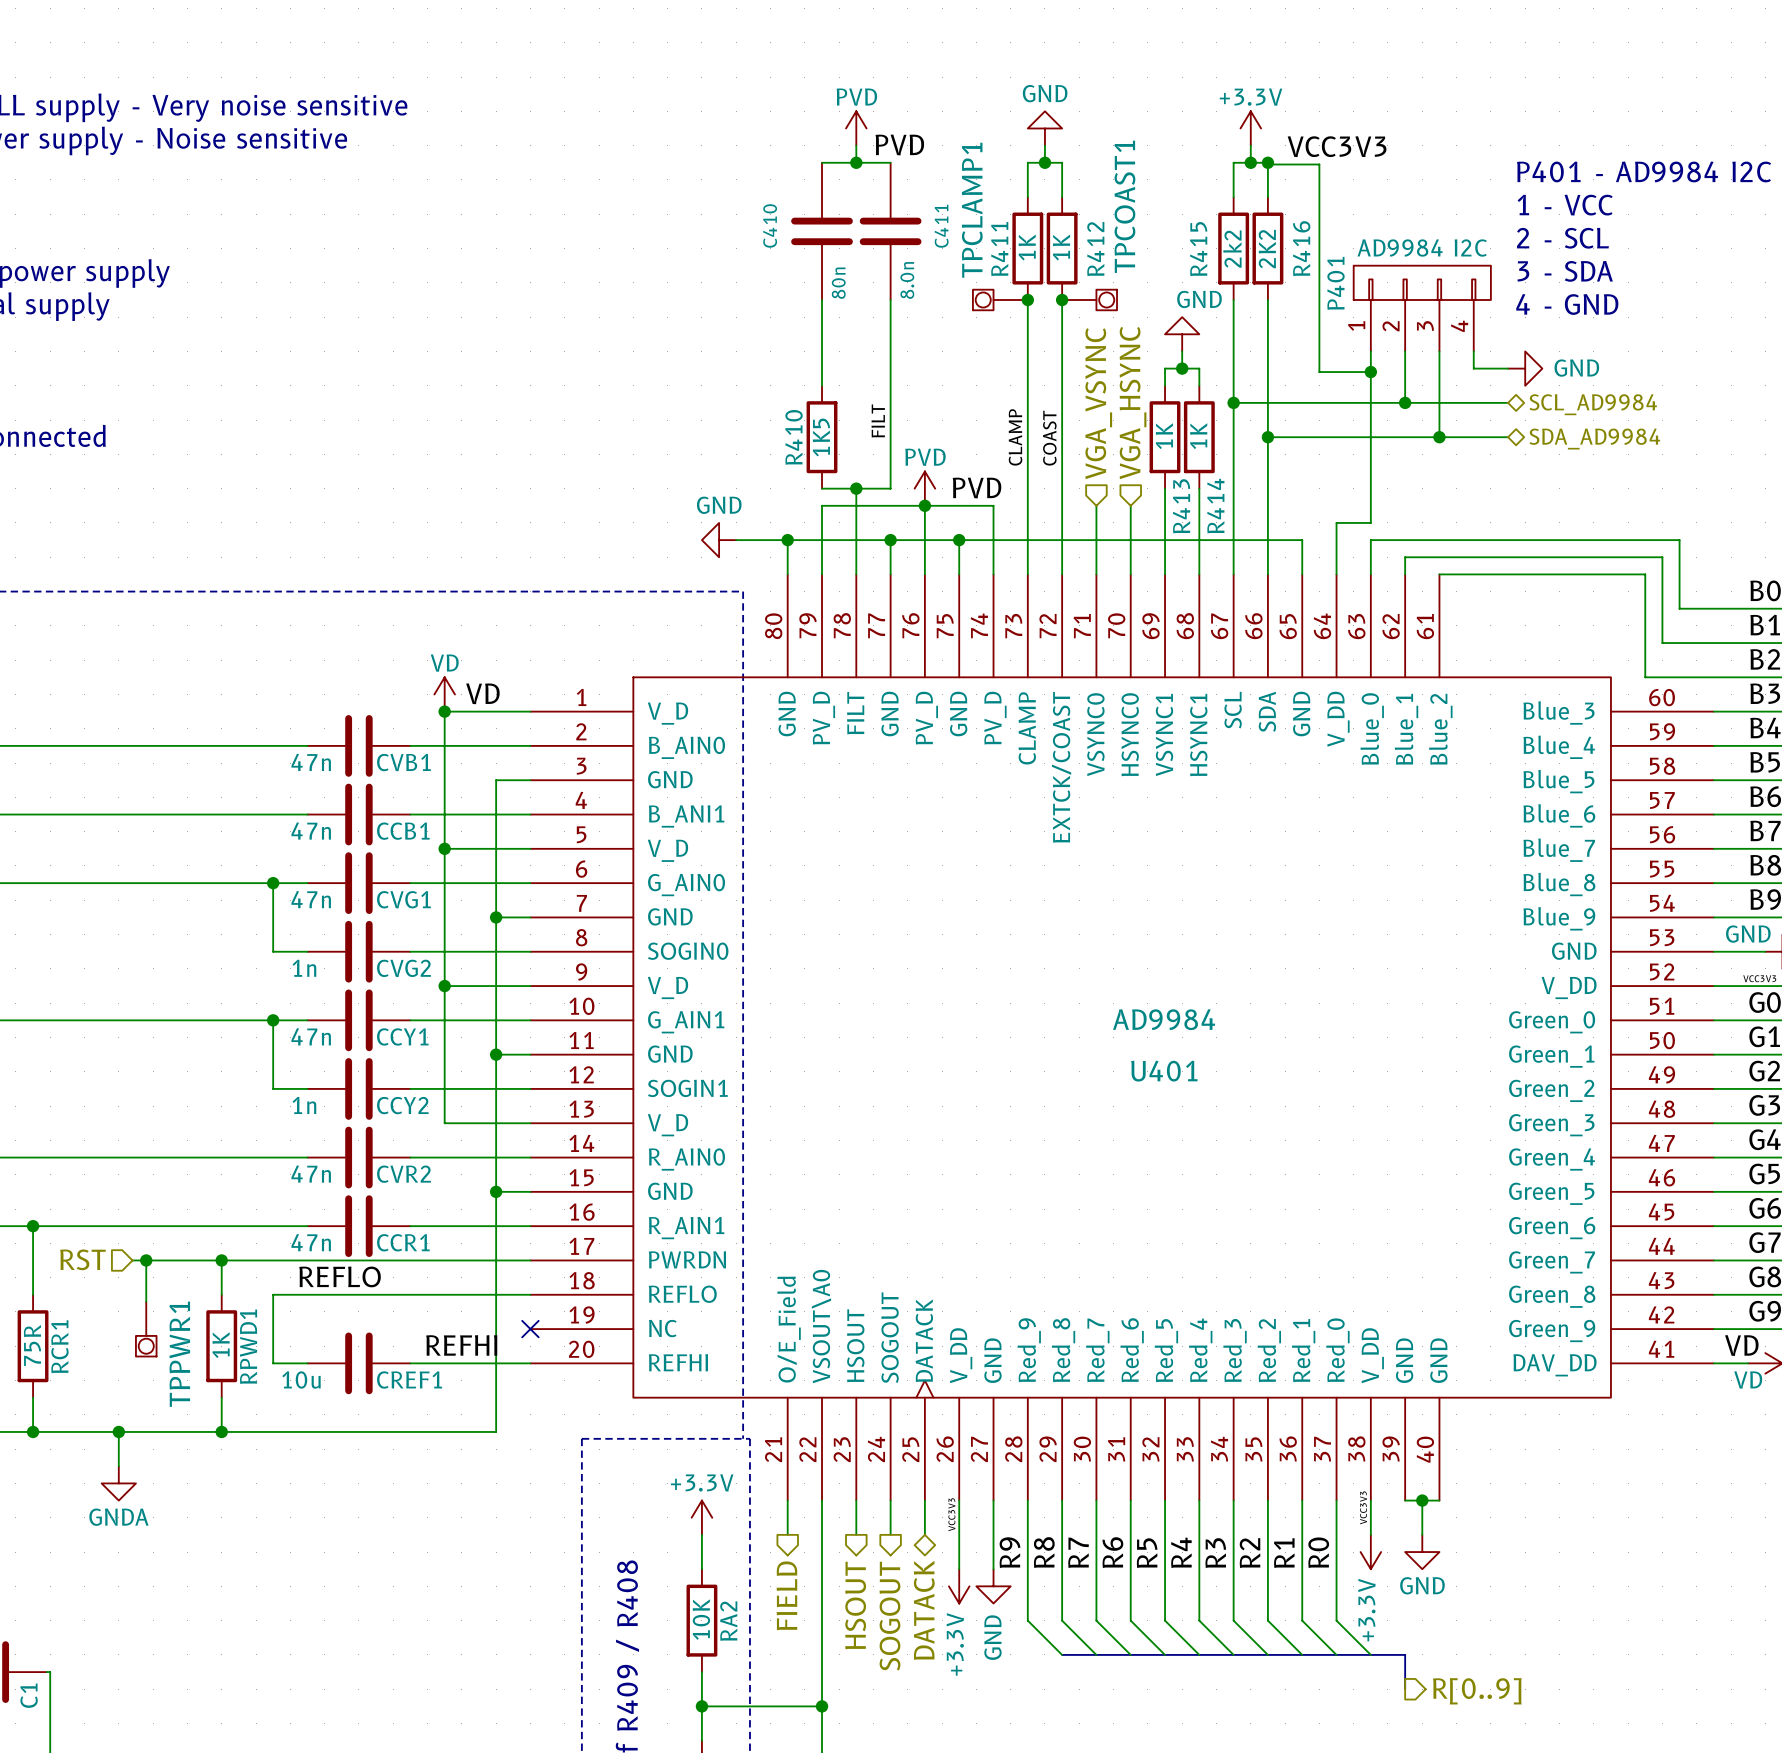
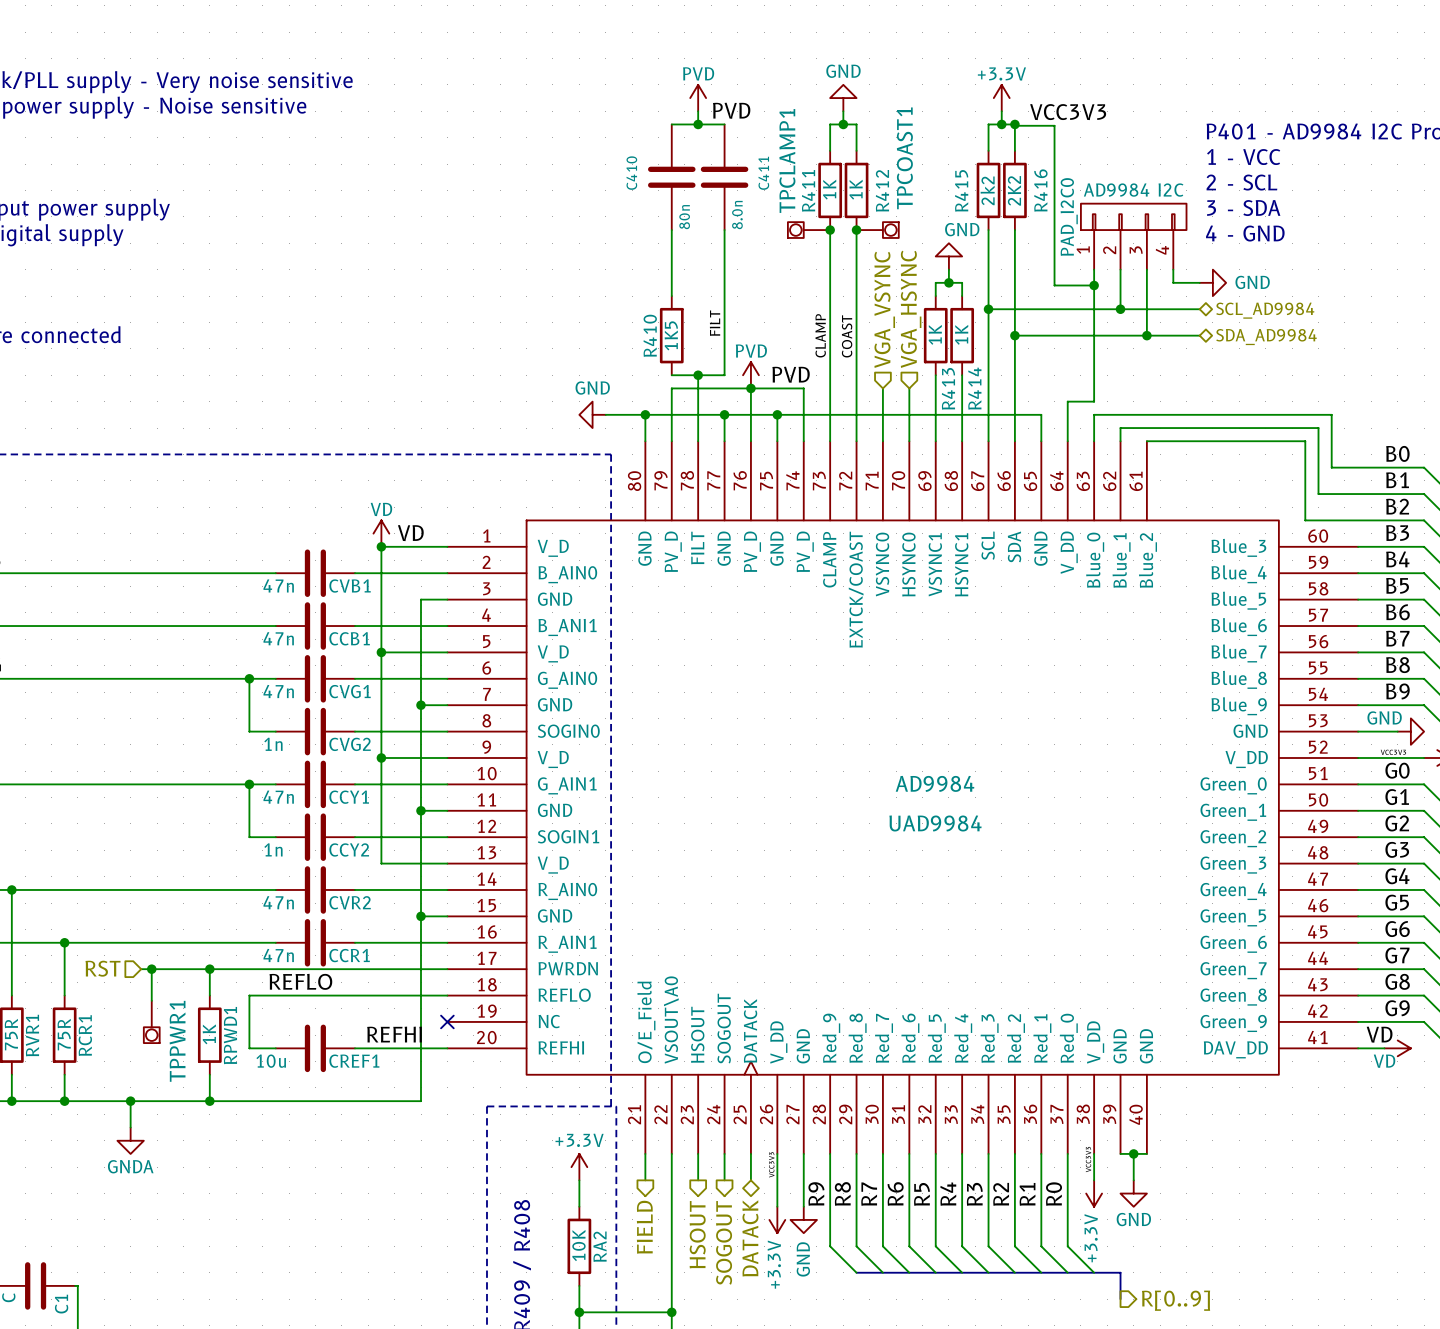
P401 name: P401 (1336, 283) -> PAD_I2C0 (1069, 217)
U401 name: U401 (1164, 1071) -> UAD9984 (935, 823)

